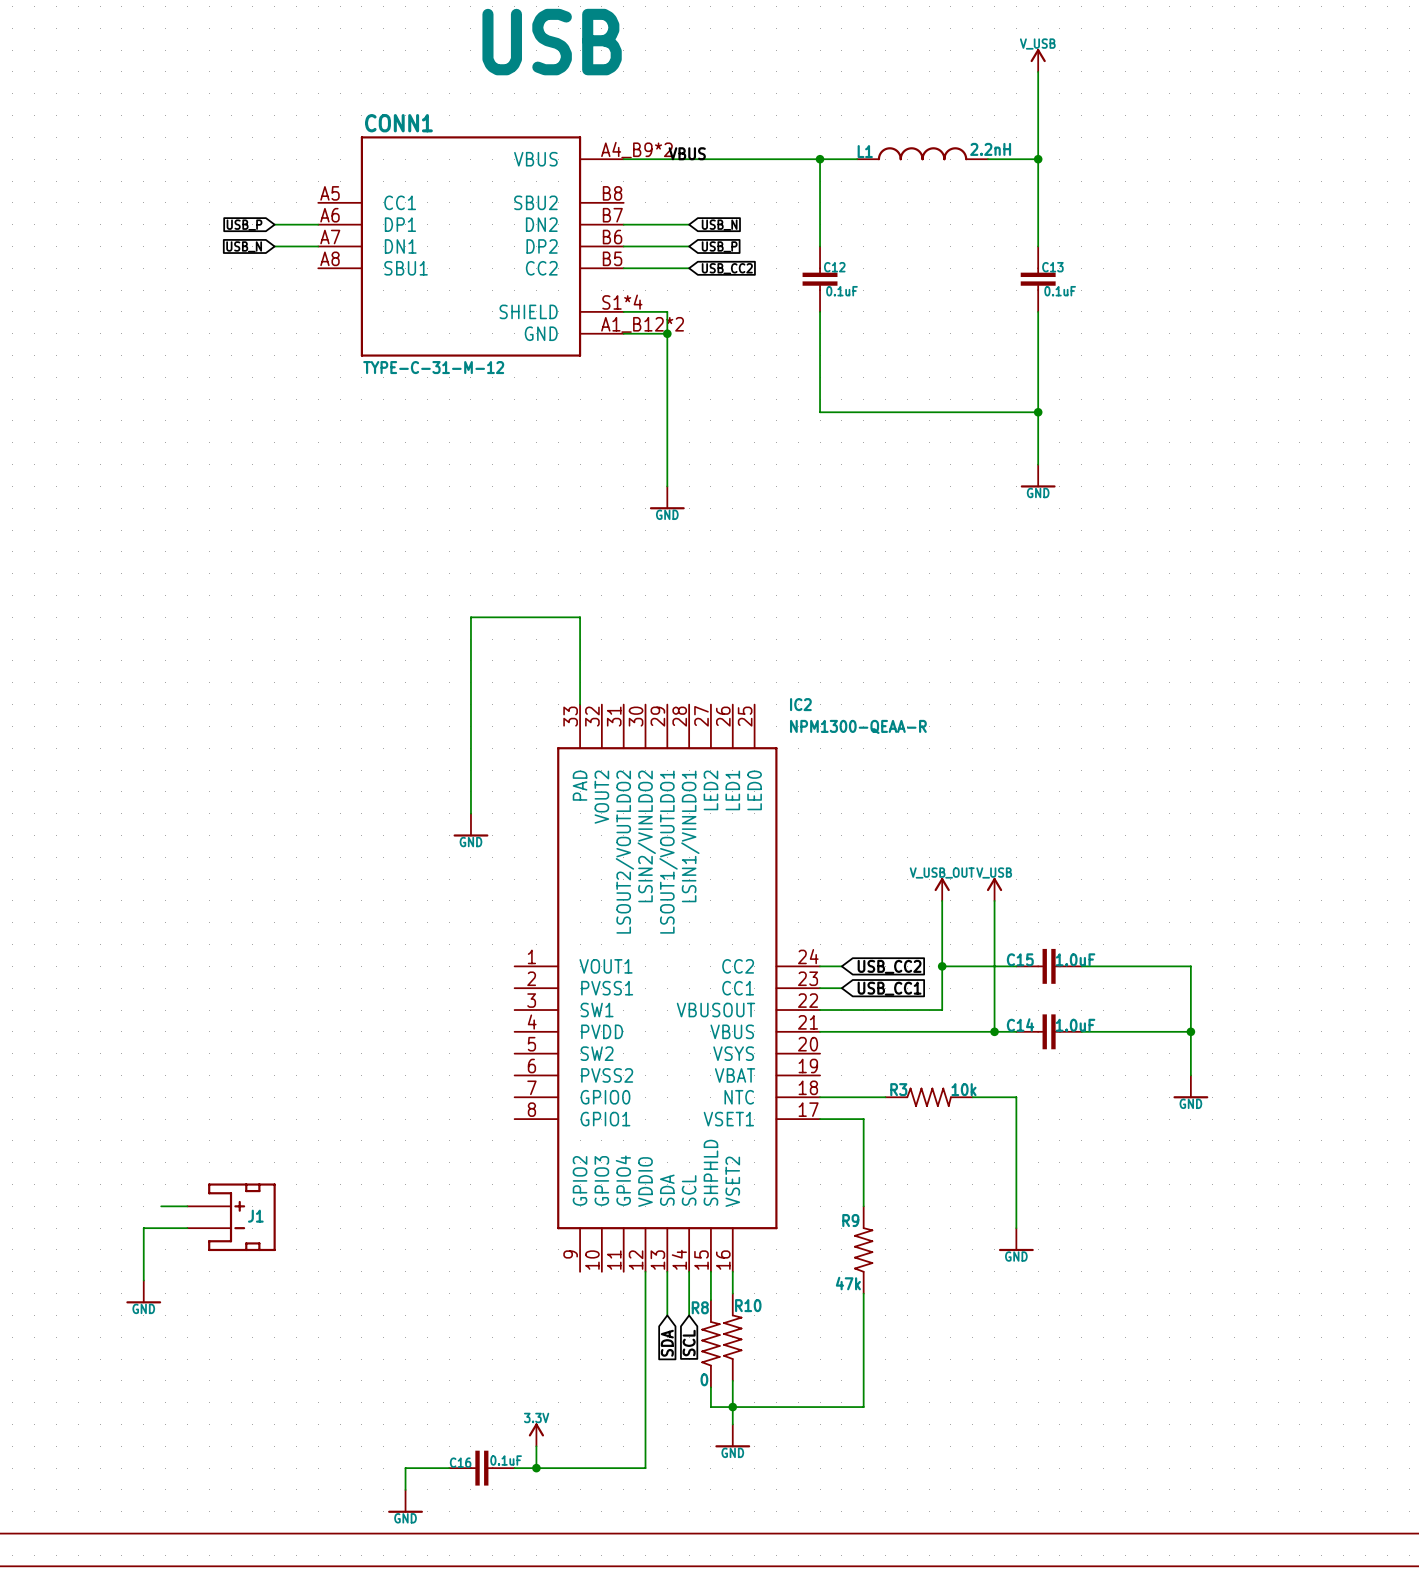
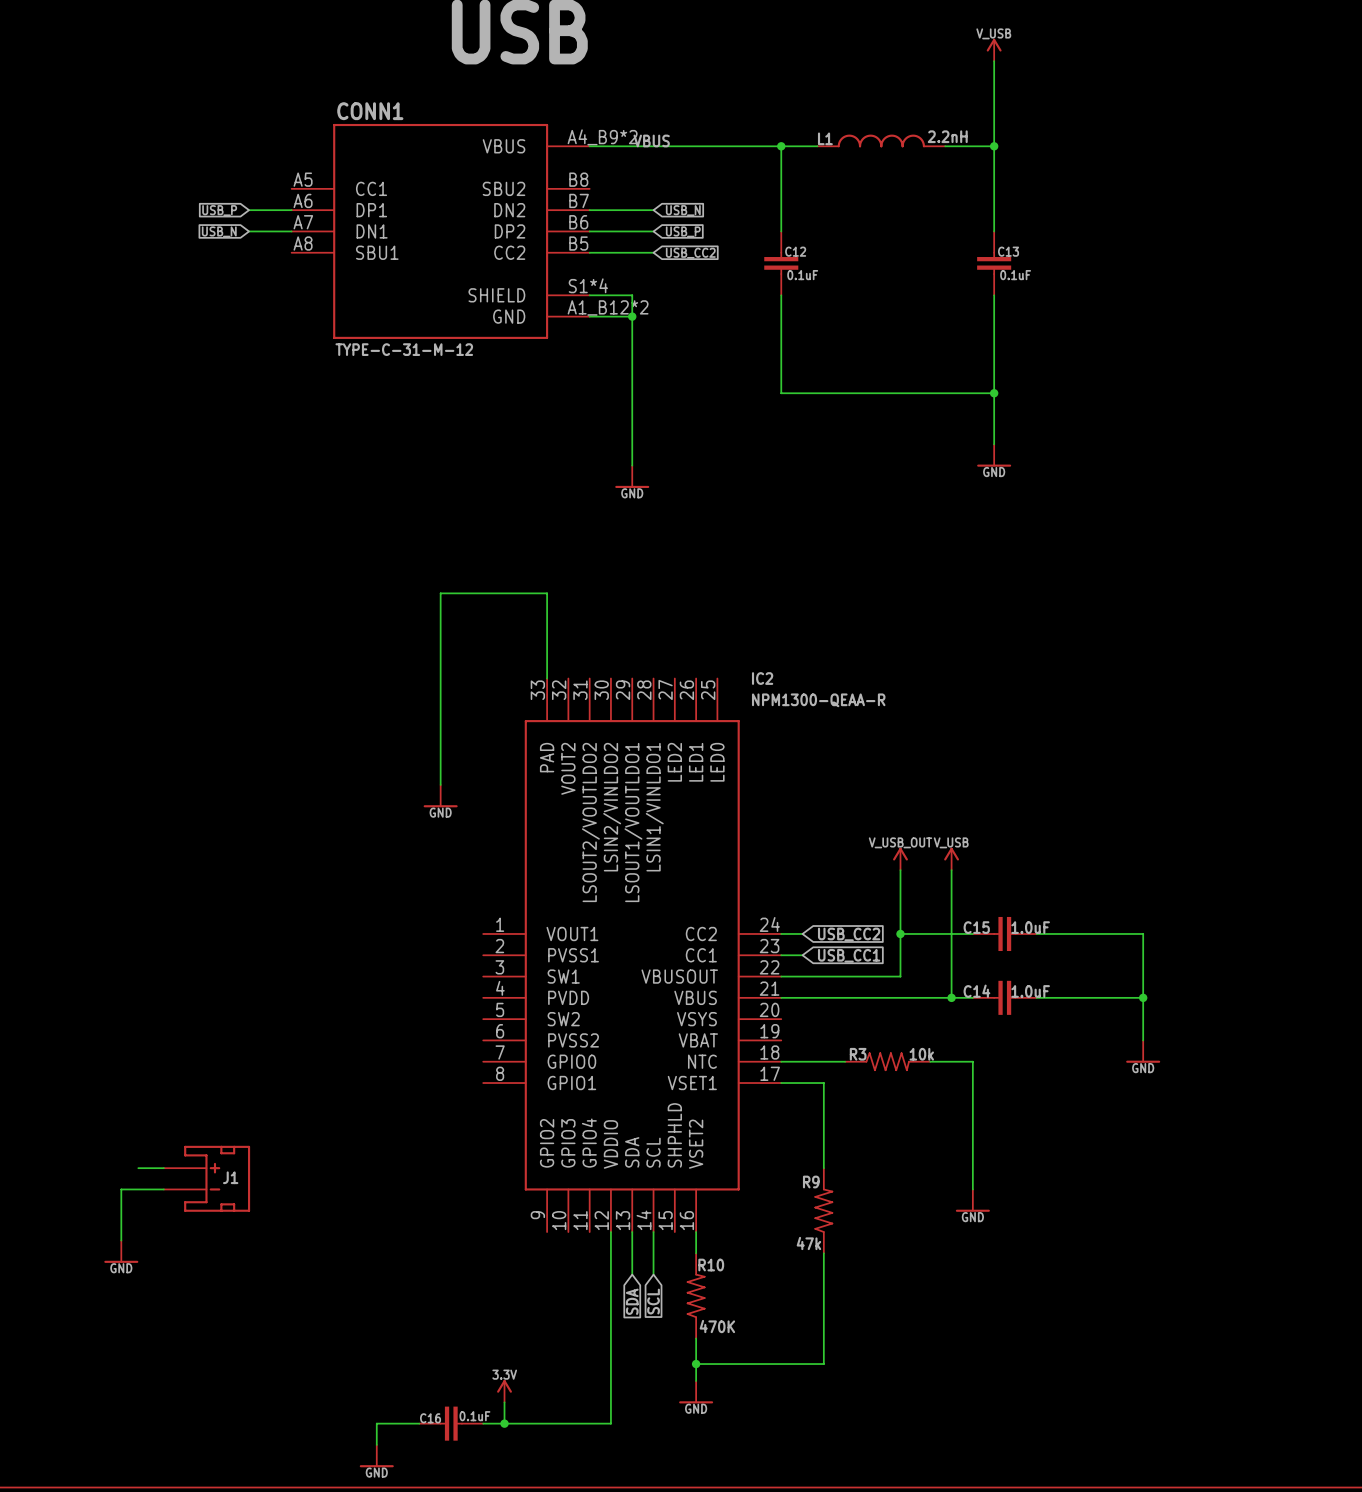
wire: (710, 1271) (710, 1300) -> none
R8: 0 (710, 1343) -> none
R10 value: none -> 470K (717, 1326)
wire: (710, 1387) (710, 1407) (732, 1407) -> none

